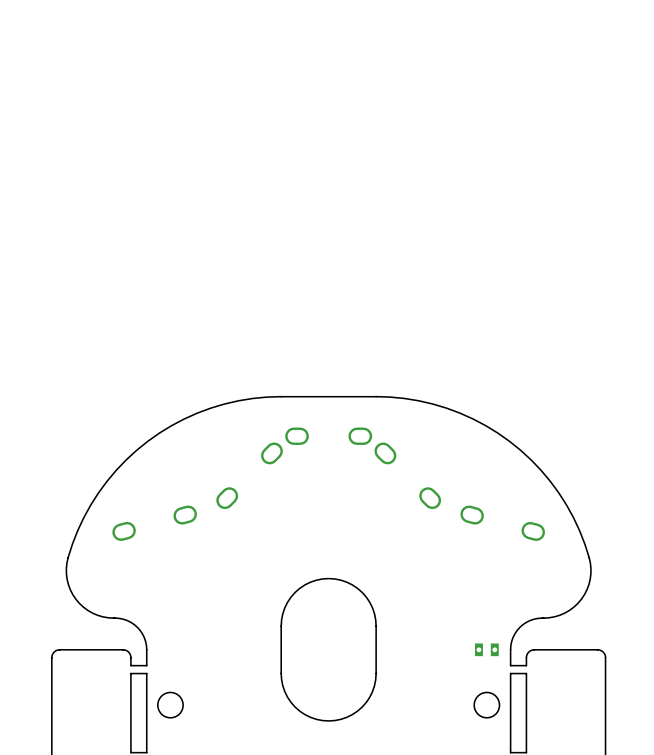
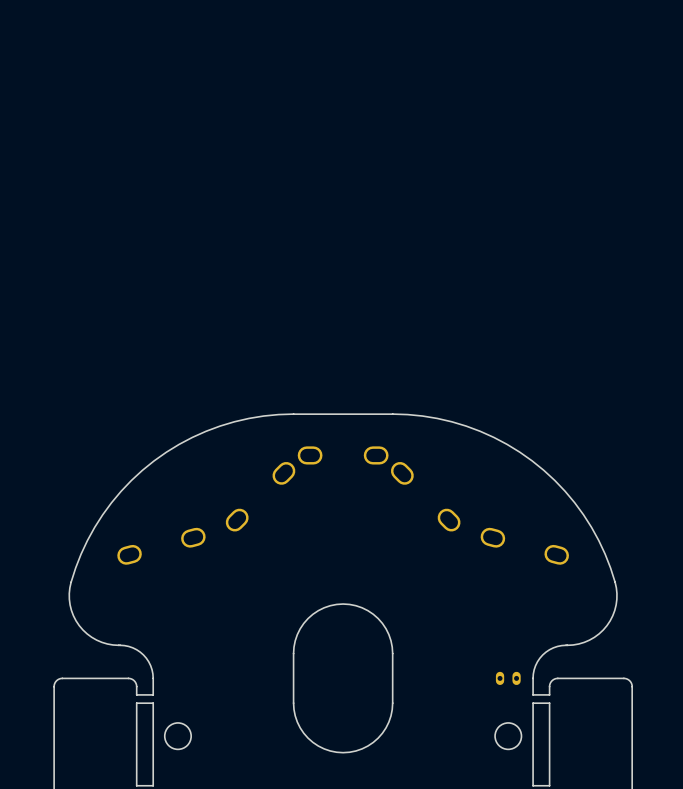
part footprint: [475, 643, 499, 657] -> [495, 671, 521, 686]

